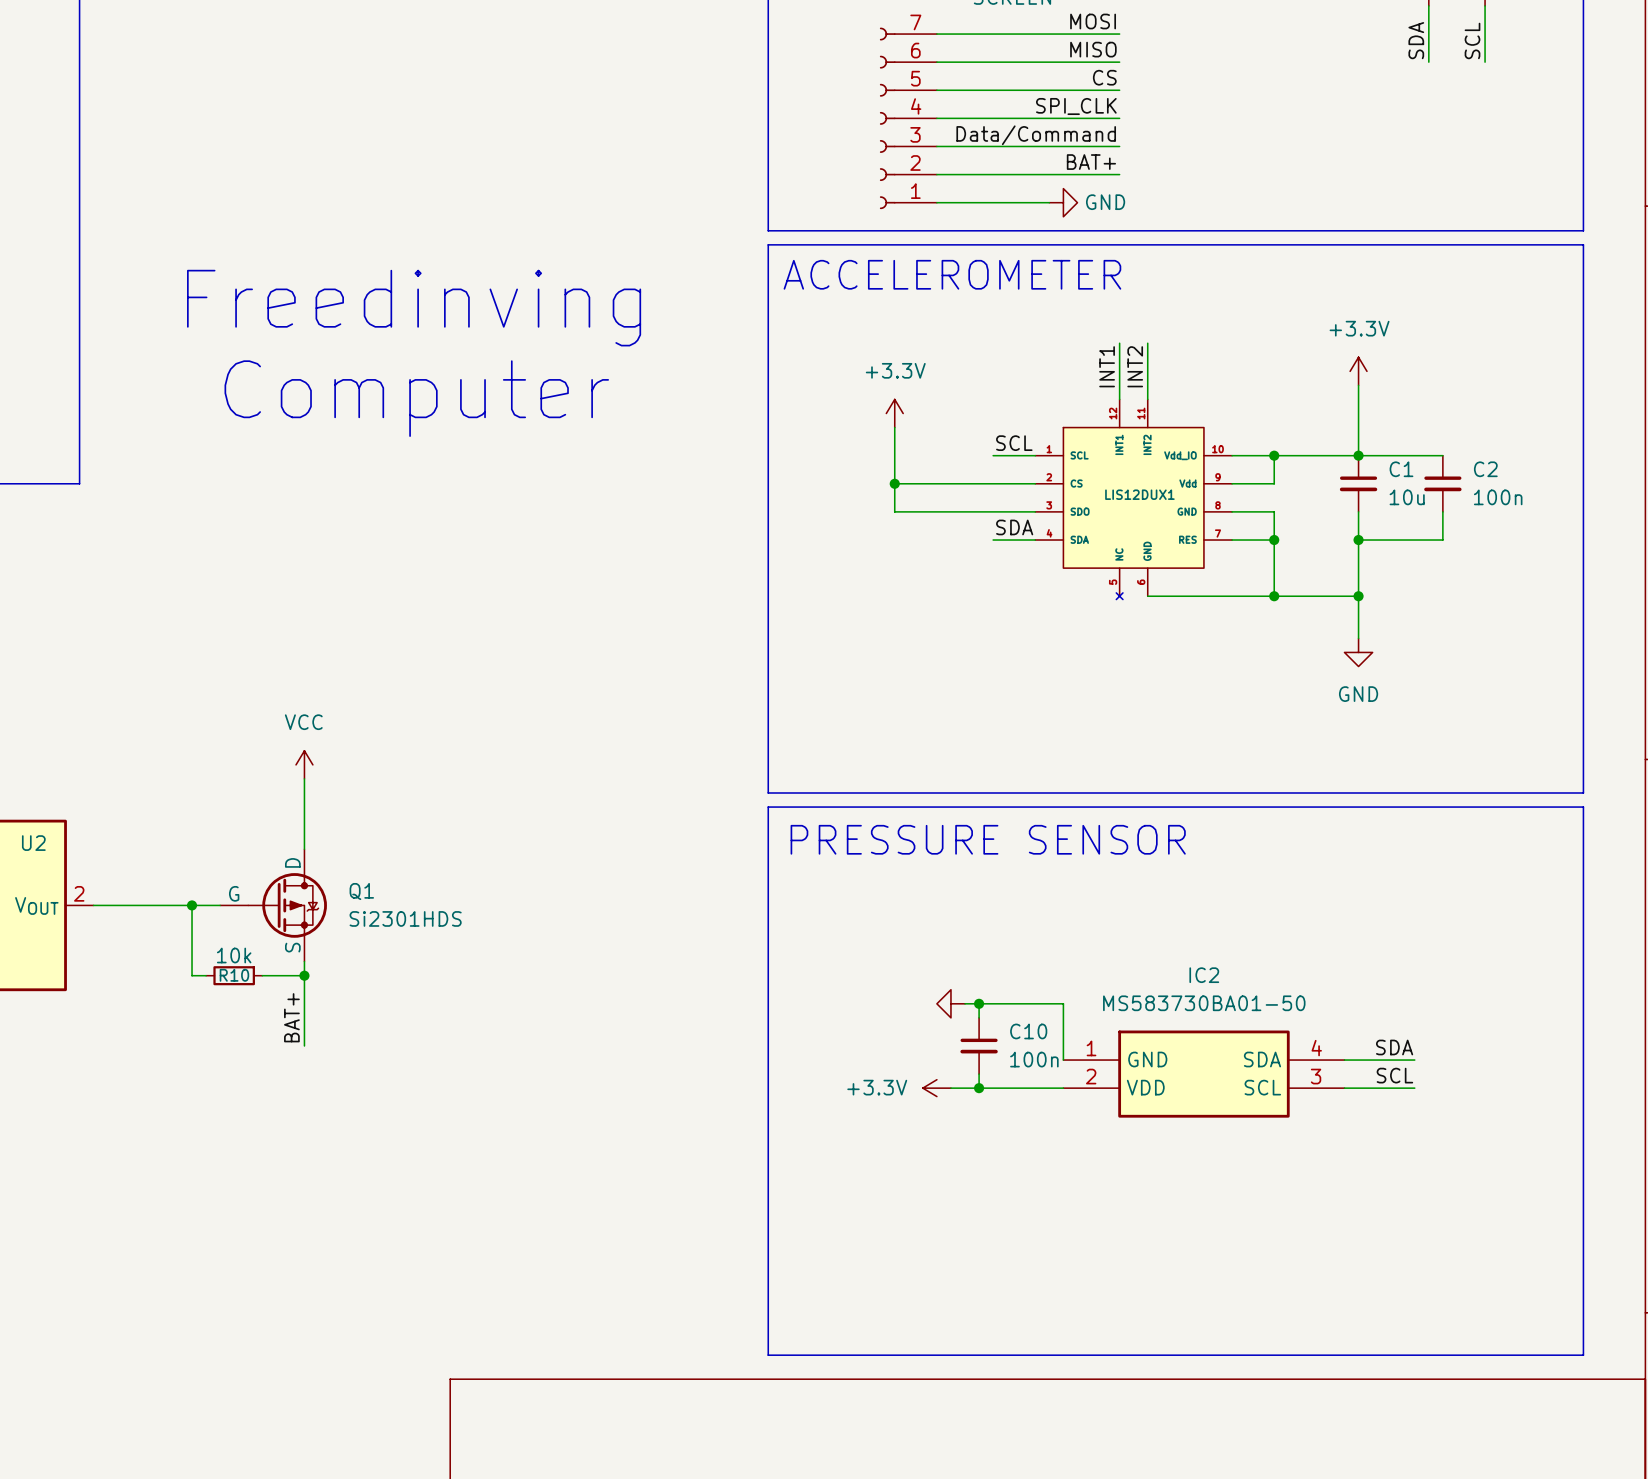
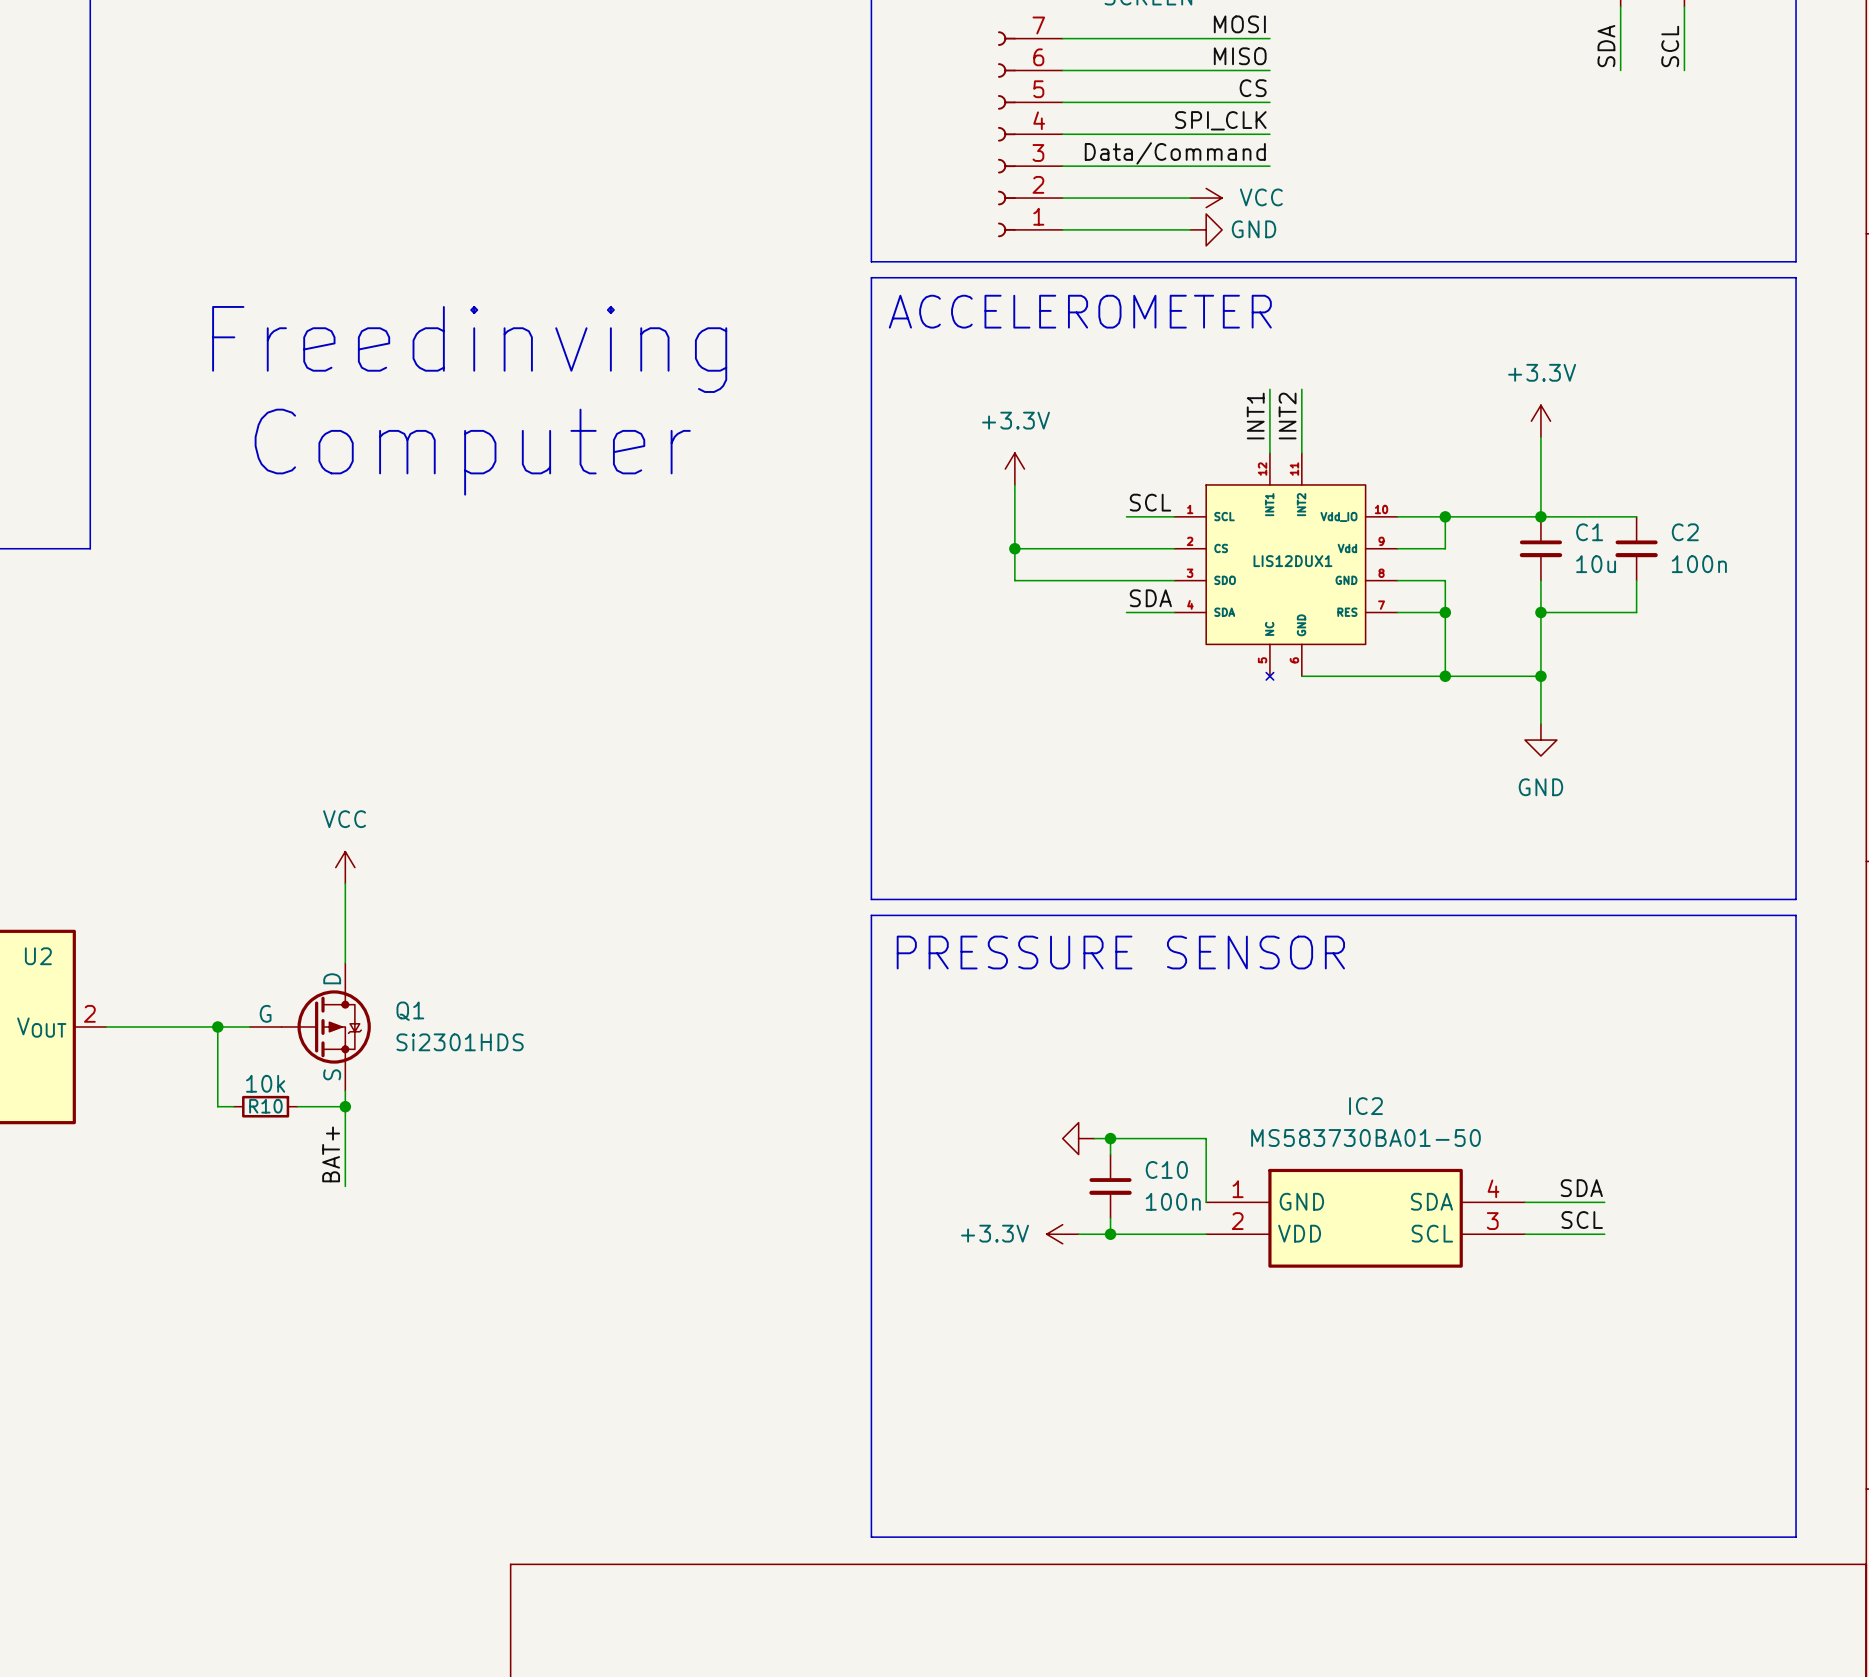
label: BAT+ (1091, 162) -> none
wire: (1049, 174) (1119, 174) -> none
power symbol: none -> VCC (1206, 198)

